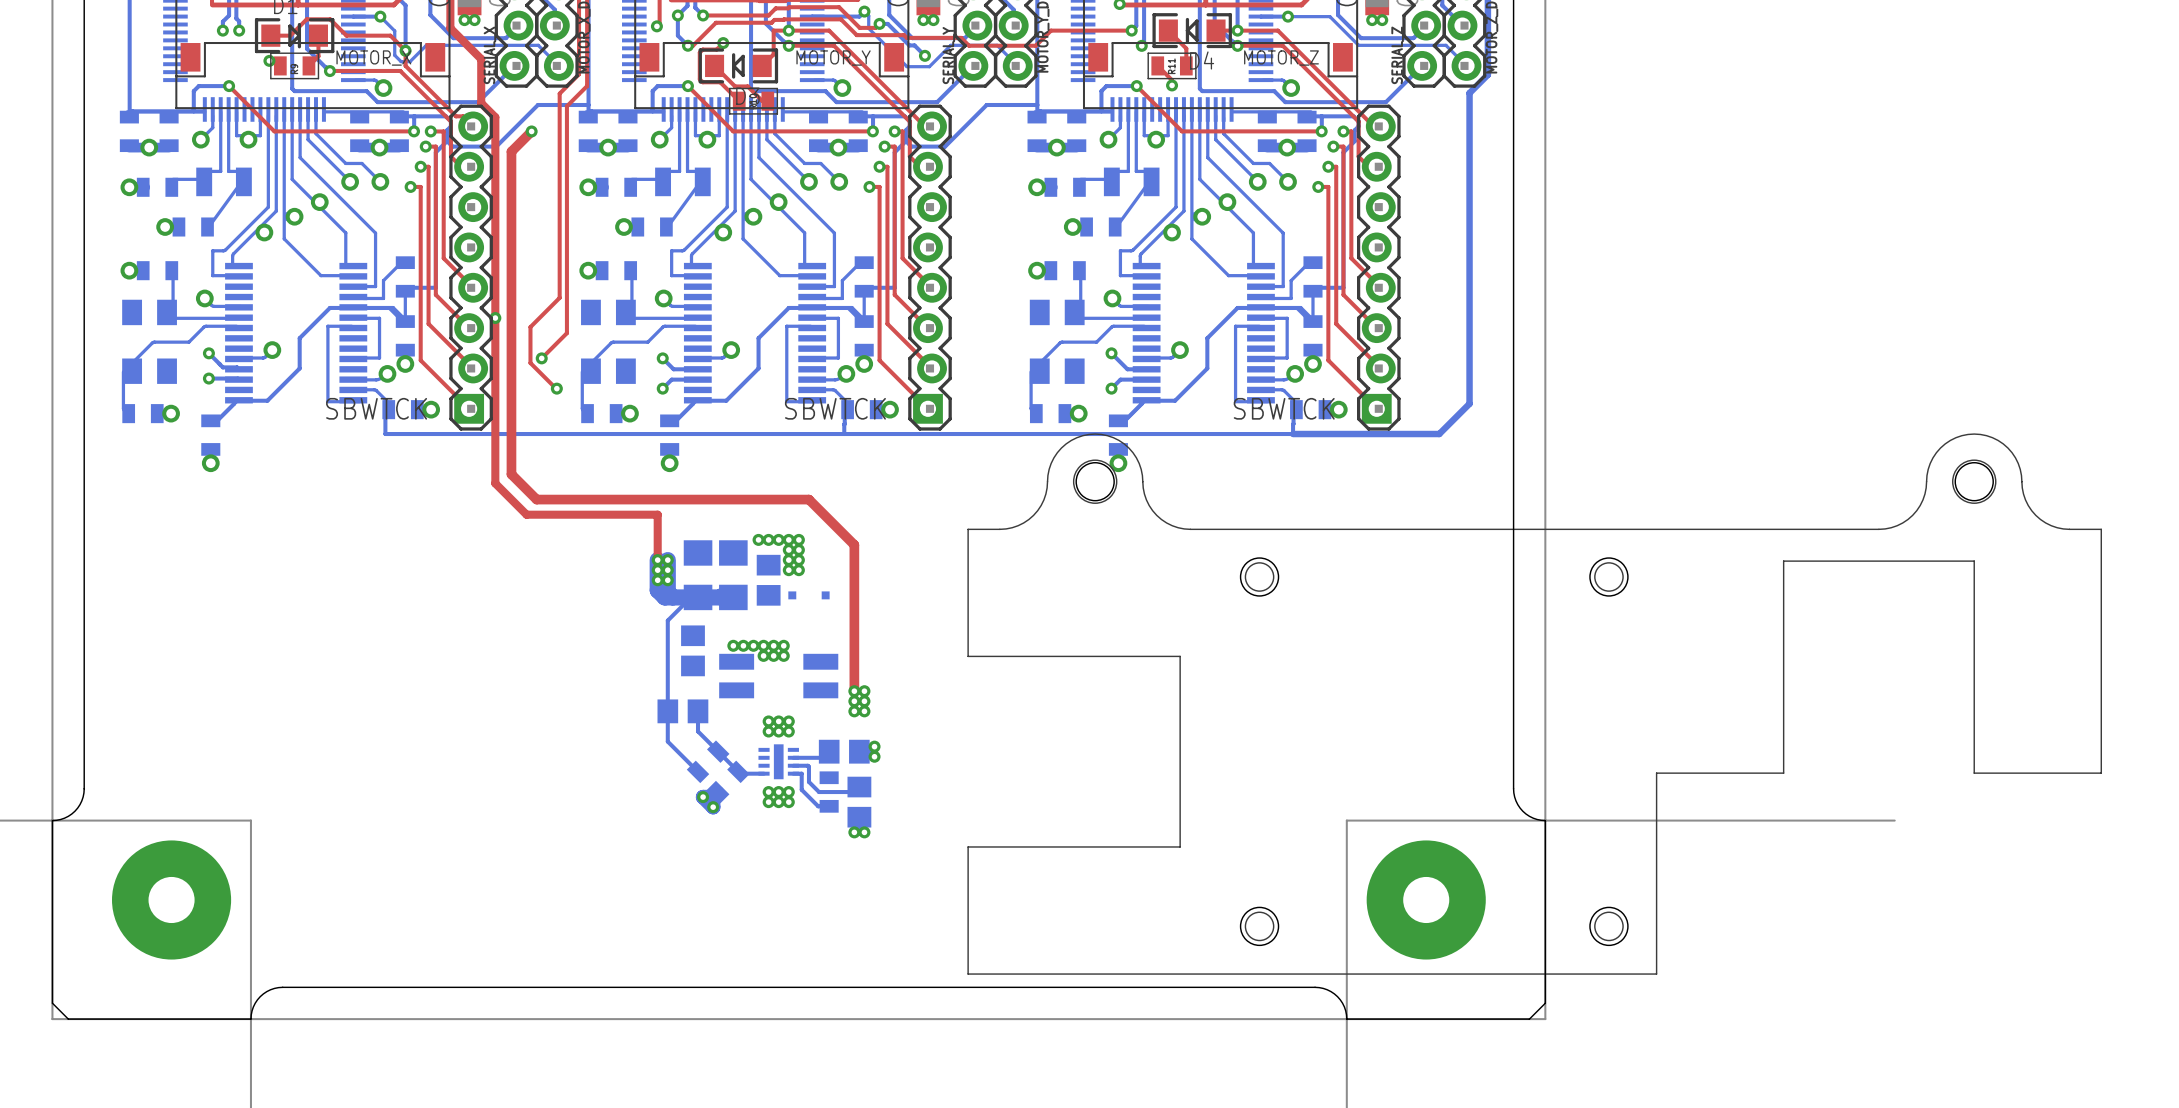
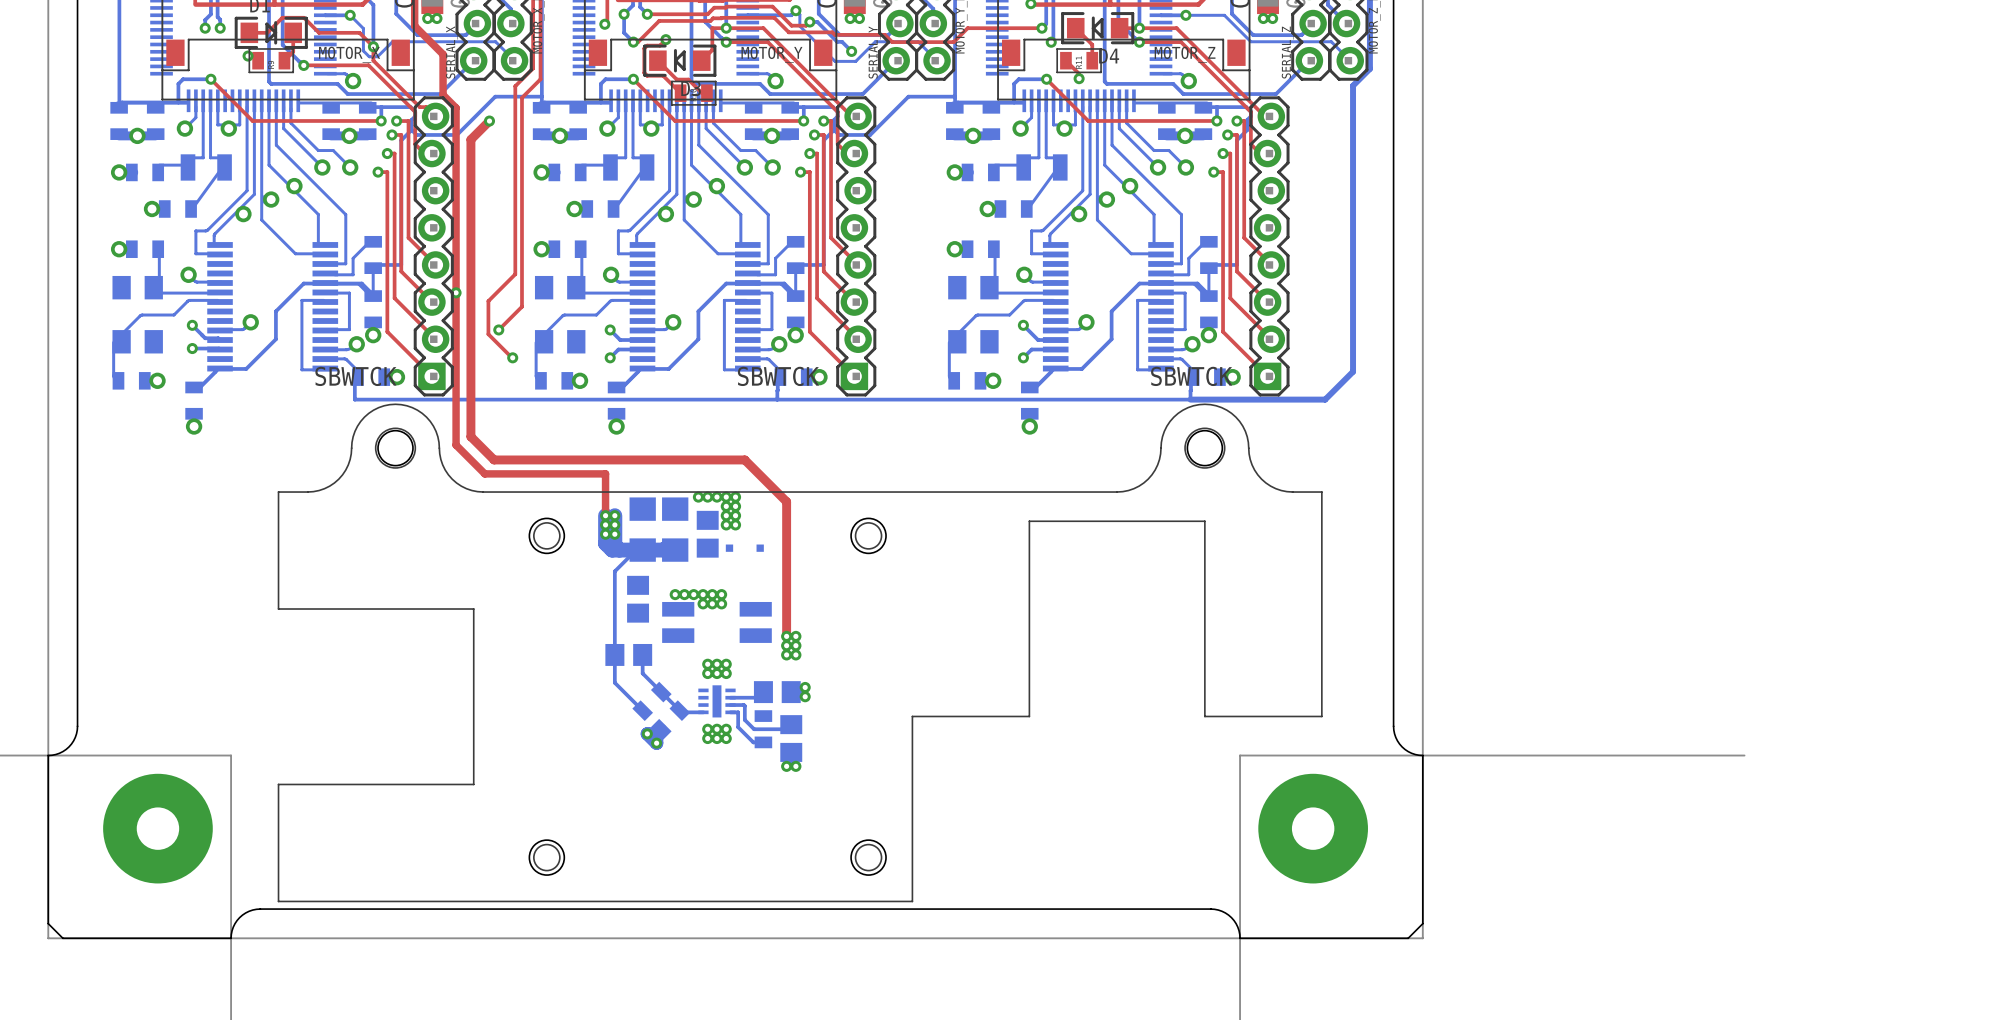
part: (1534, 704) -> none
part: none -> (800, 652)

